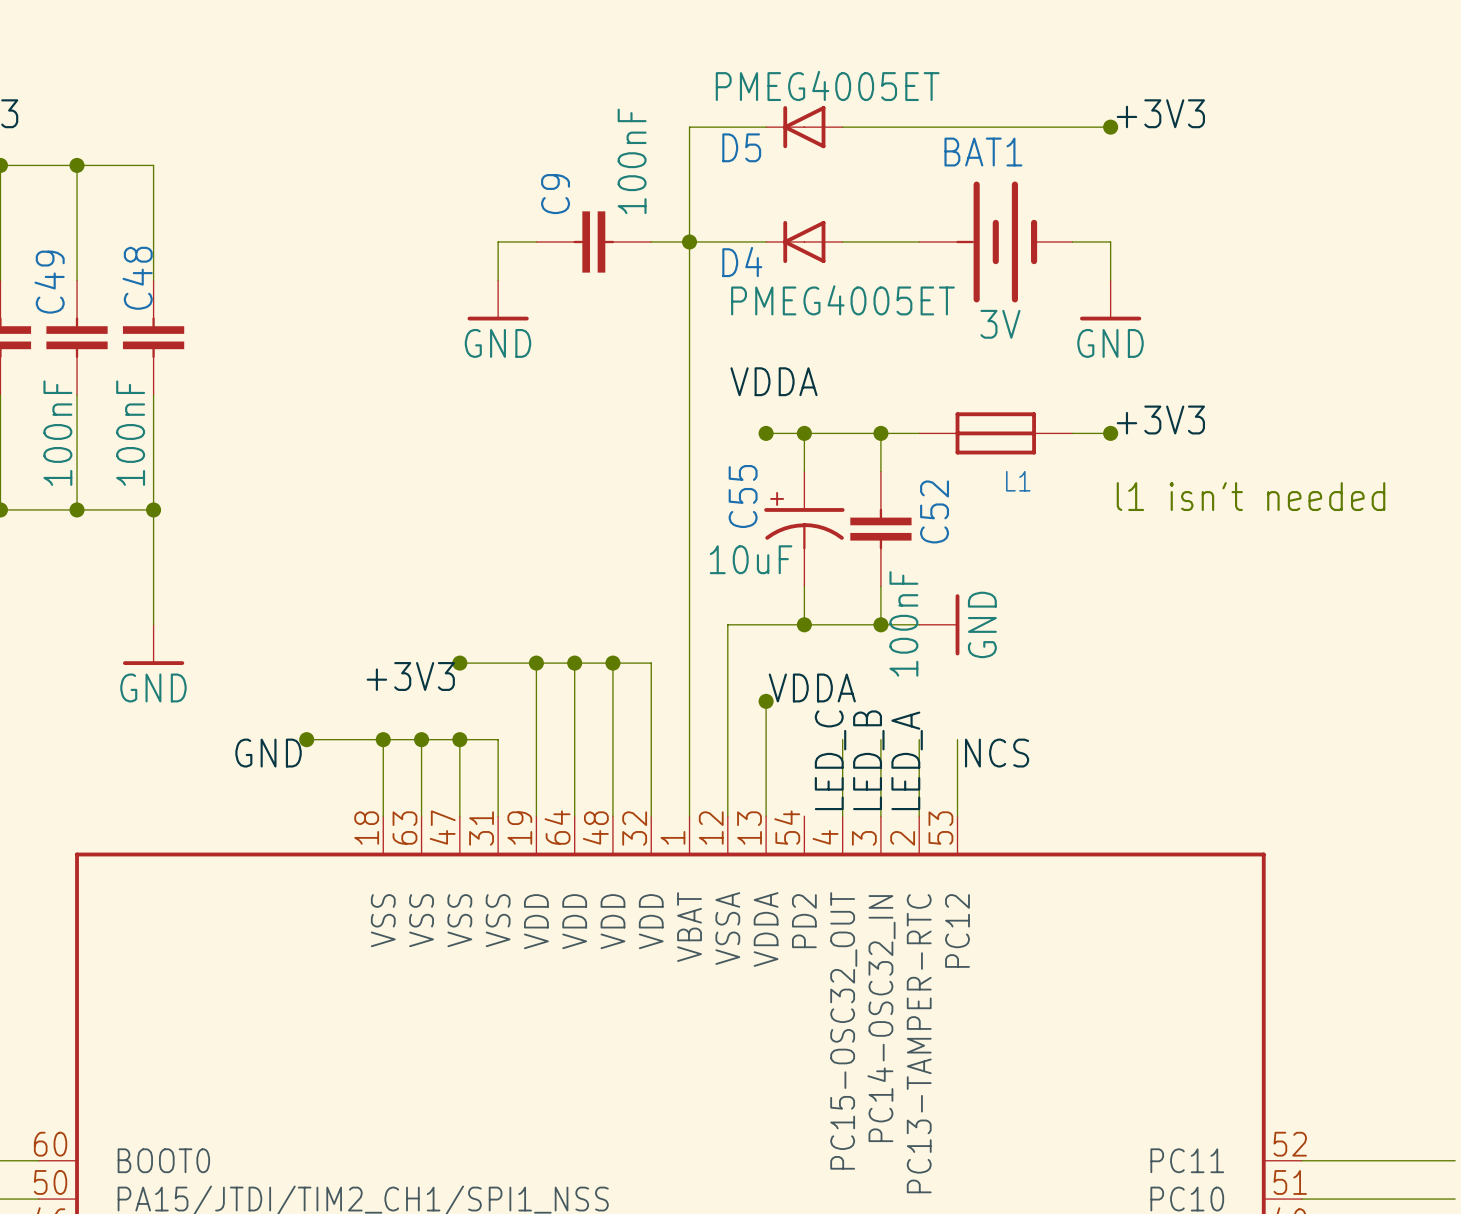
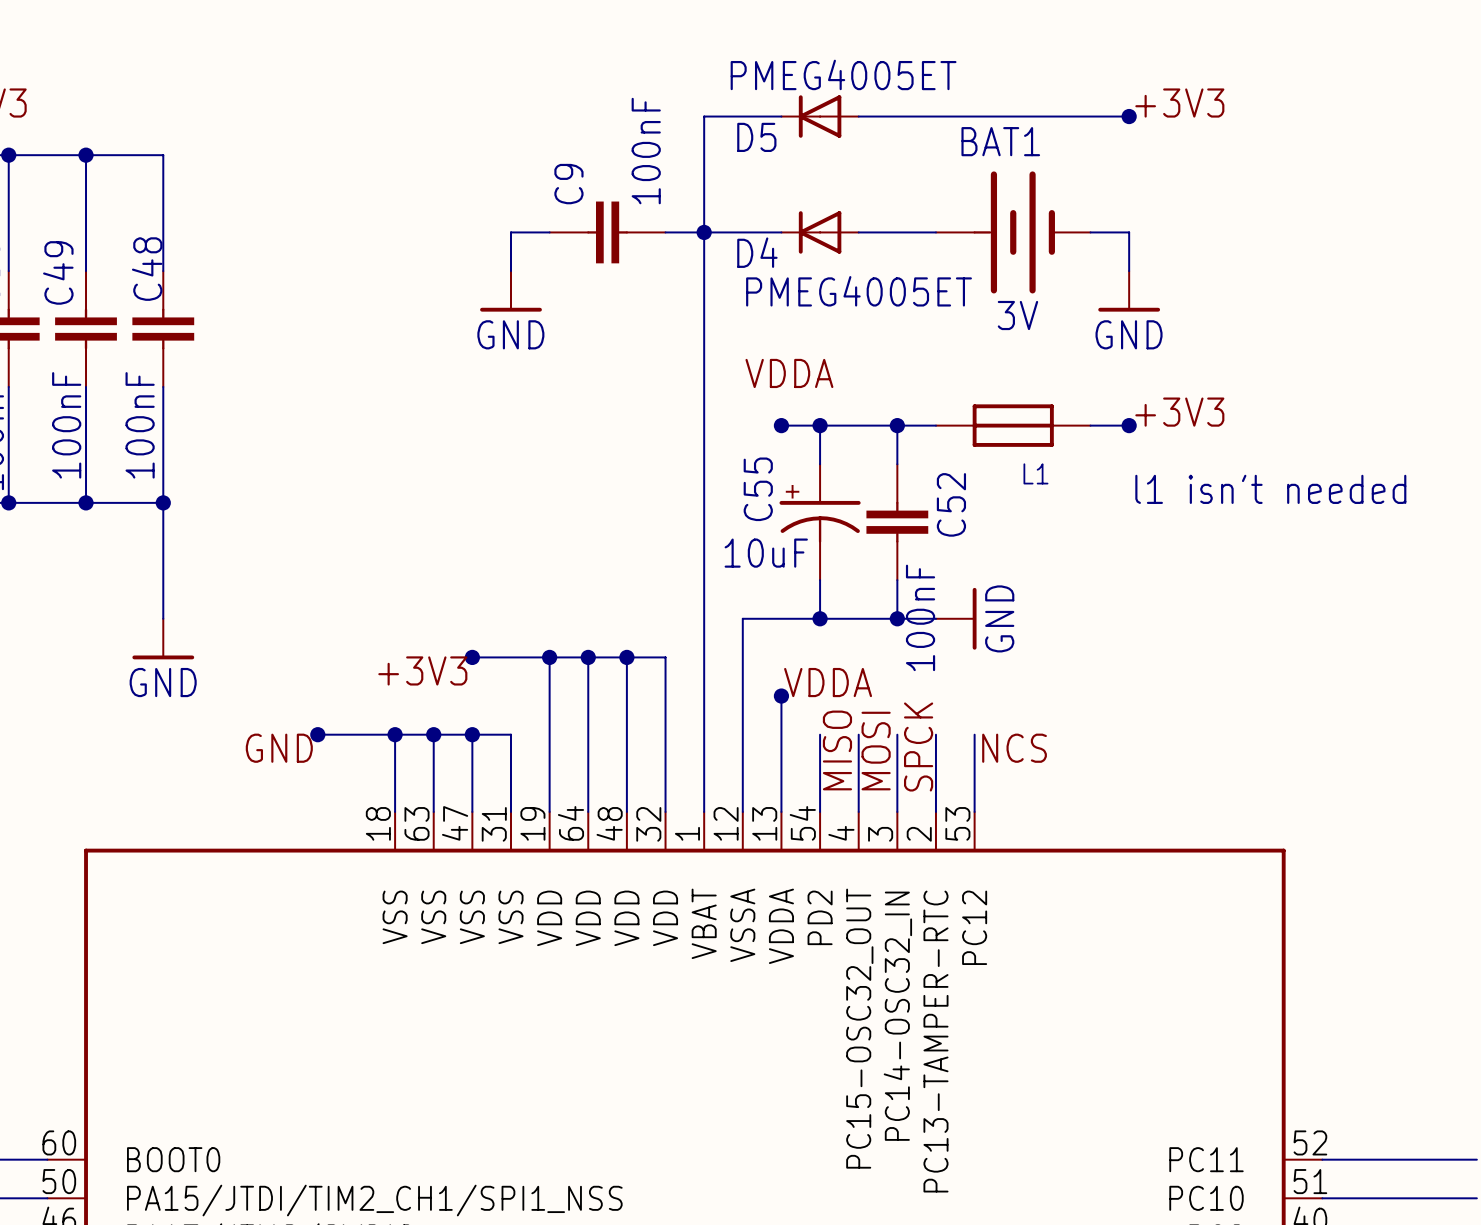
wire: none -> (820, 734) (820, 811)
label: none -> SPCK (918, 746)
label: none -> MISO (837, 750)
label: none -> MOSI (876, 751)
label: LED_C (830, 760) -> none
label: LED_B (868, 760) -> none
label: LED_A (907, 760) -> none

